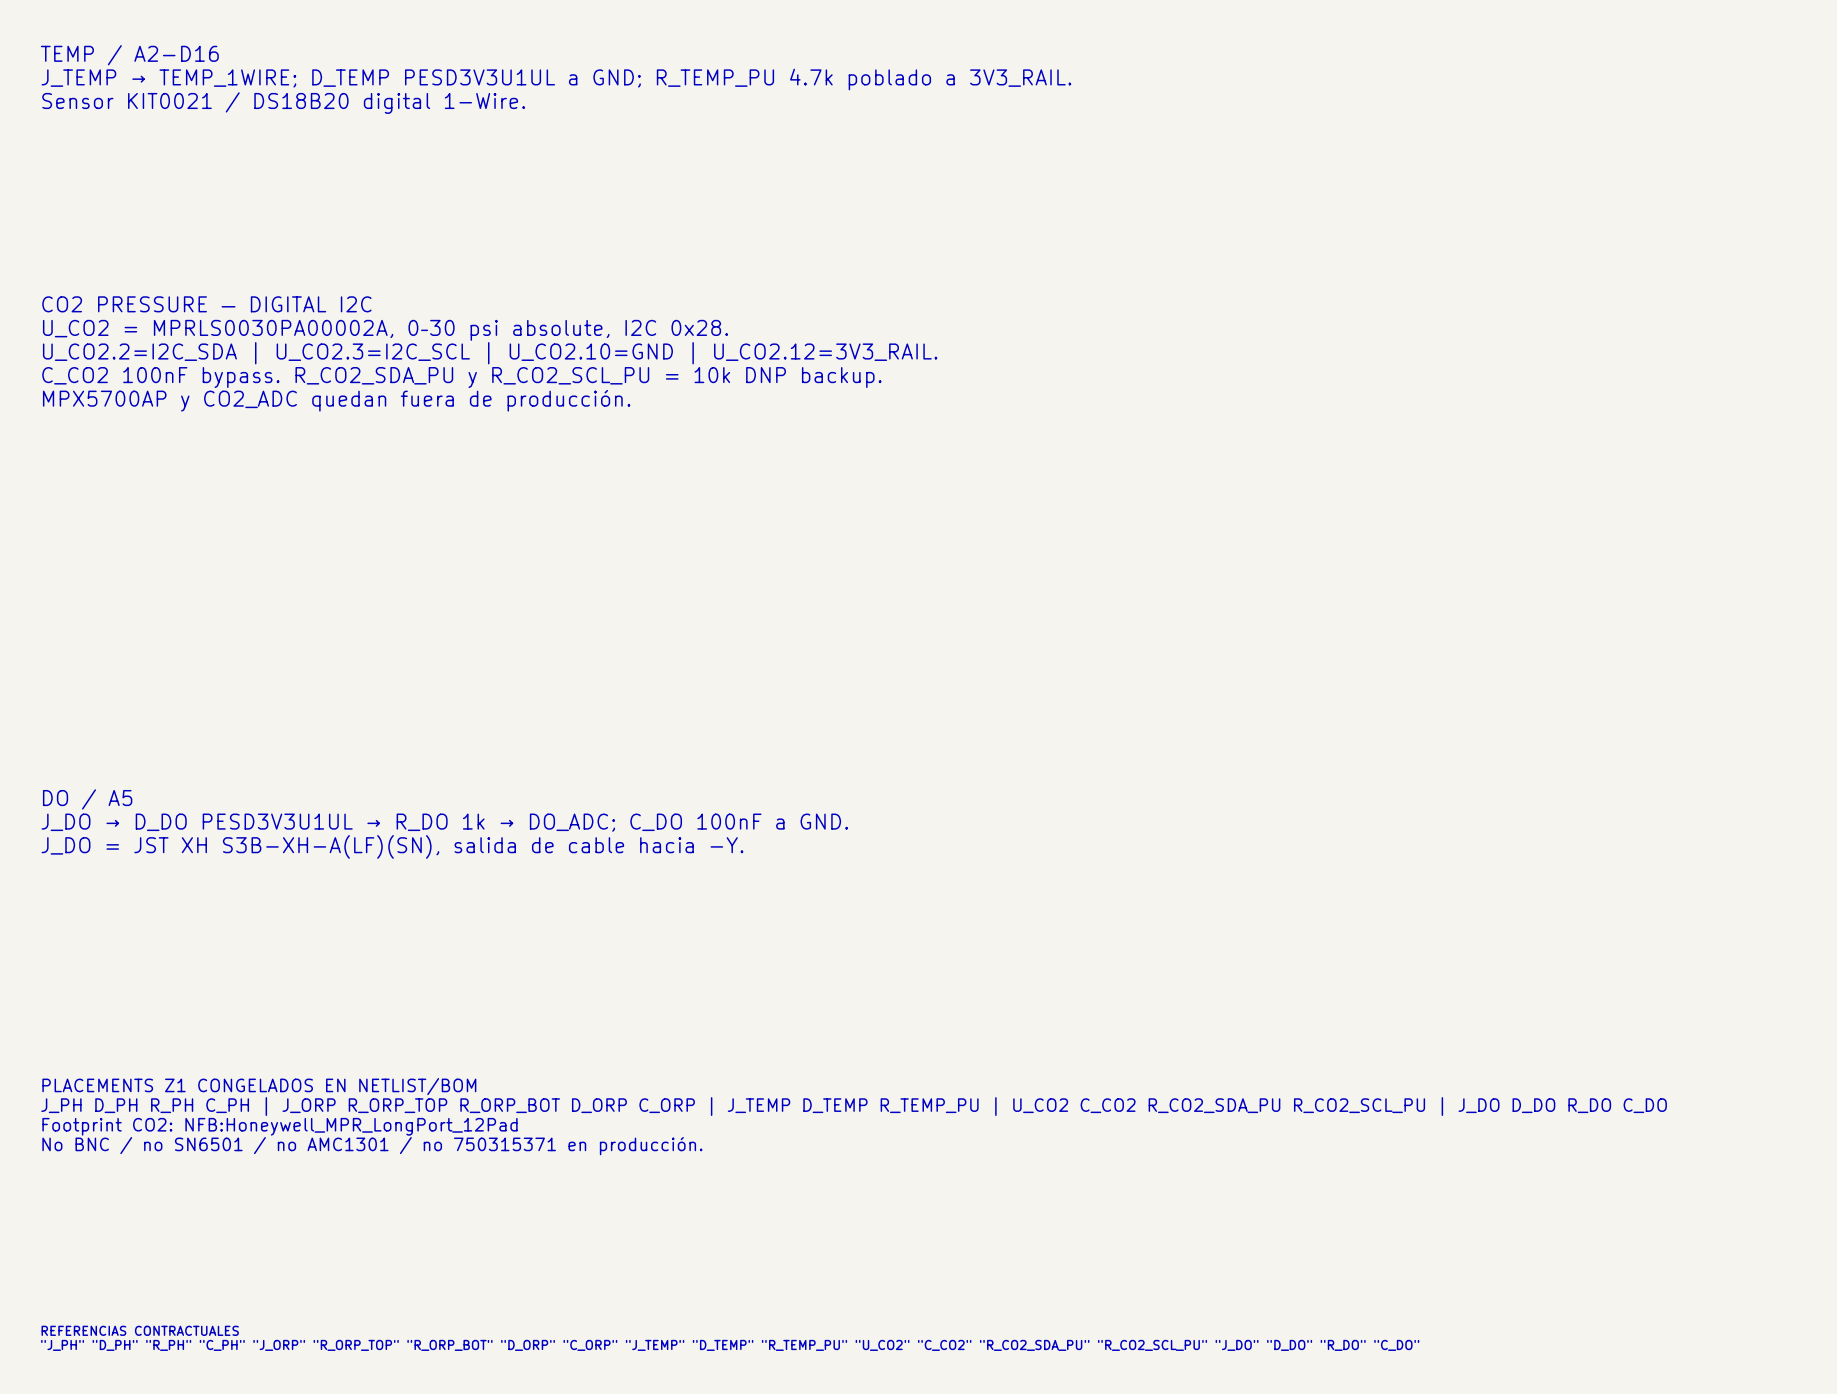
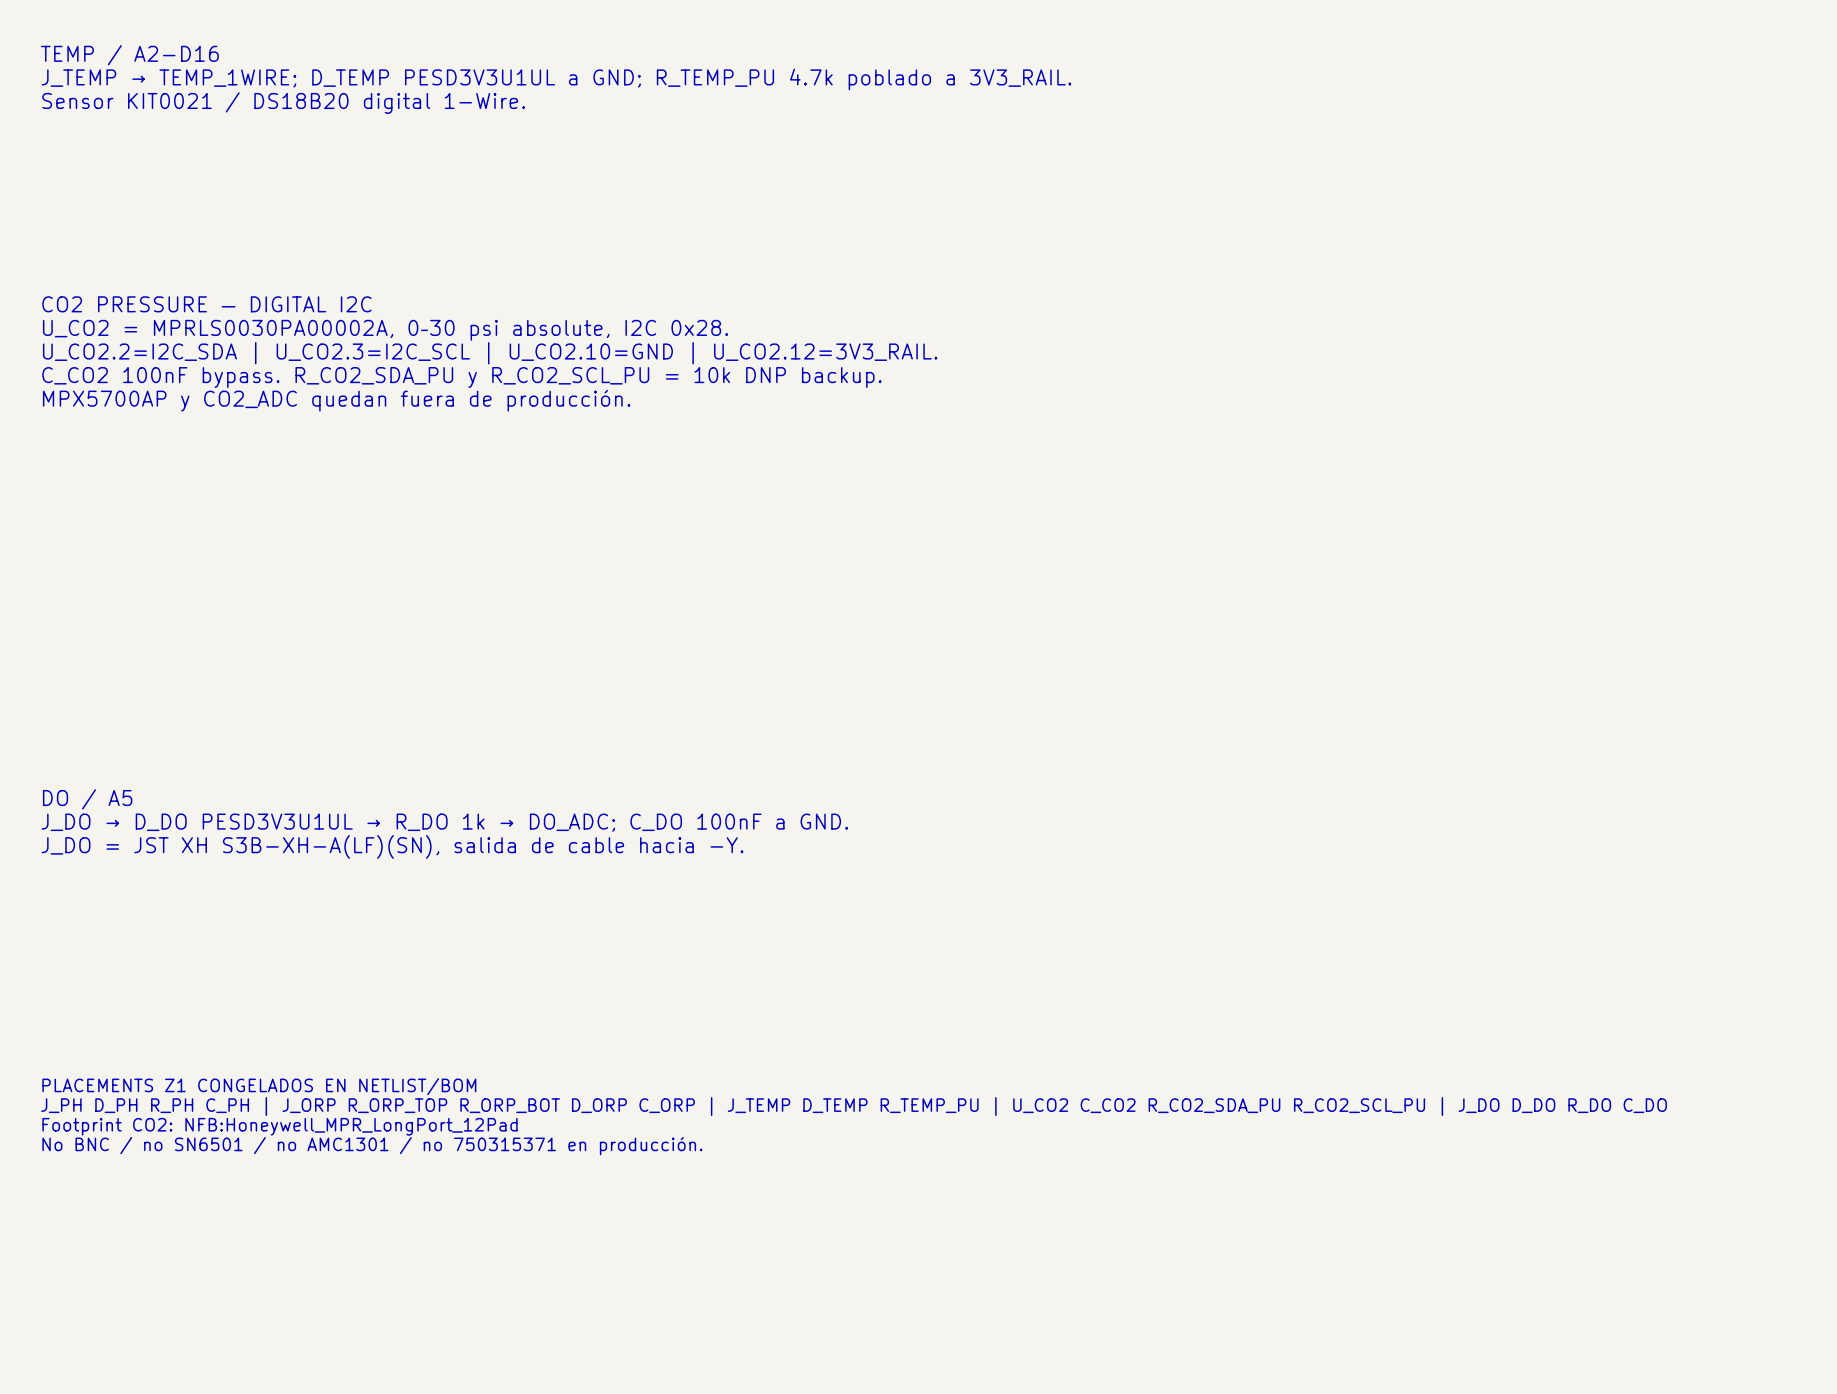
text: REFERENCIAS CONTRACTUALES (140, 1330) -> none
text: "J_PH" "D_PH" "R_PH" "C_PH" "J_ORP" "R_ORP_TOP" "R_ORP_BOT" "D_ORP" "C_ORP" "J_TEMP" "D_TEMP" "R_TEMP_PU" "U_CO2" "C_CO2" "R_CO2_SDA_PU" "R_CO2_SCL_PU" "J_DO" "D_DO" "R_DO" "C_DO" (730, 1345) -> none

